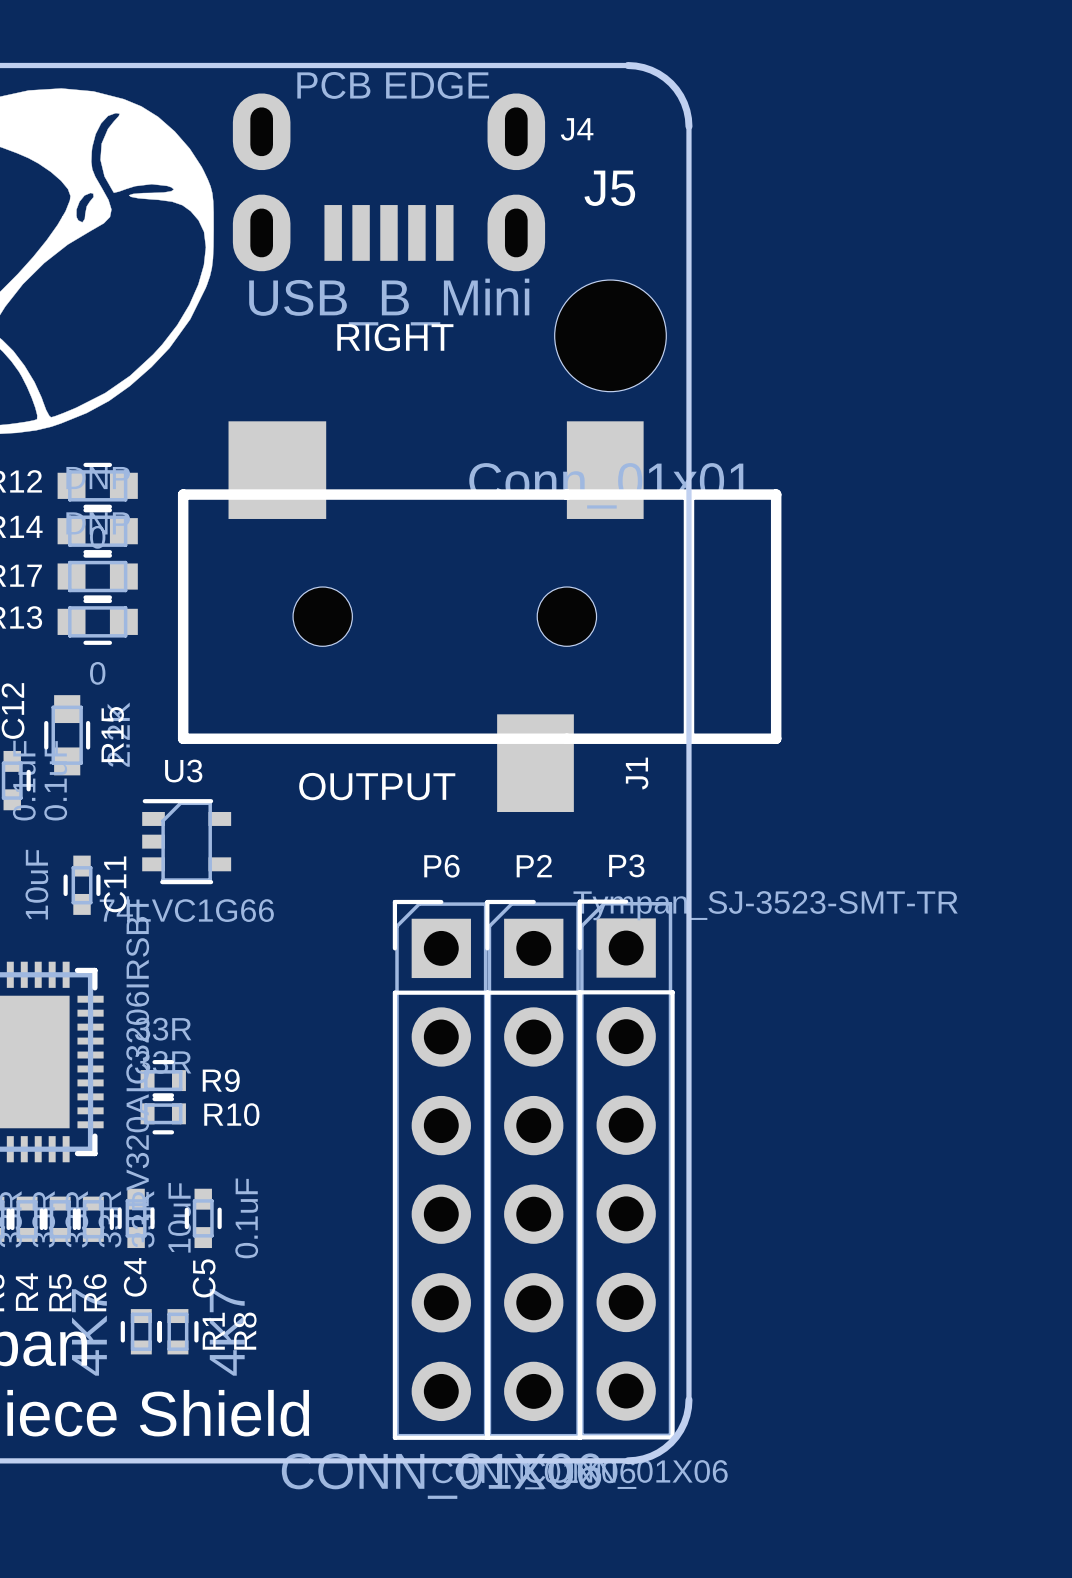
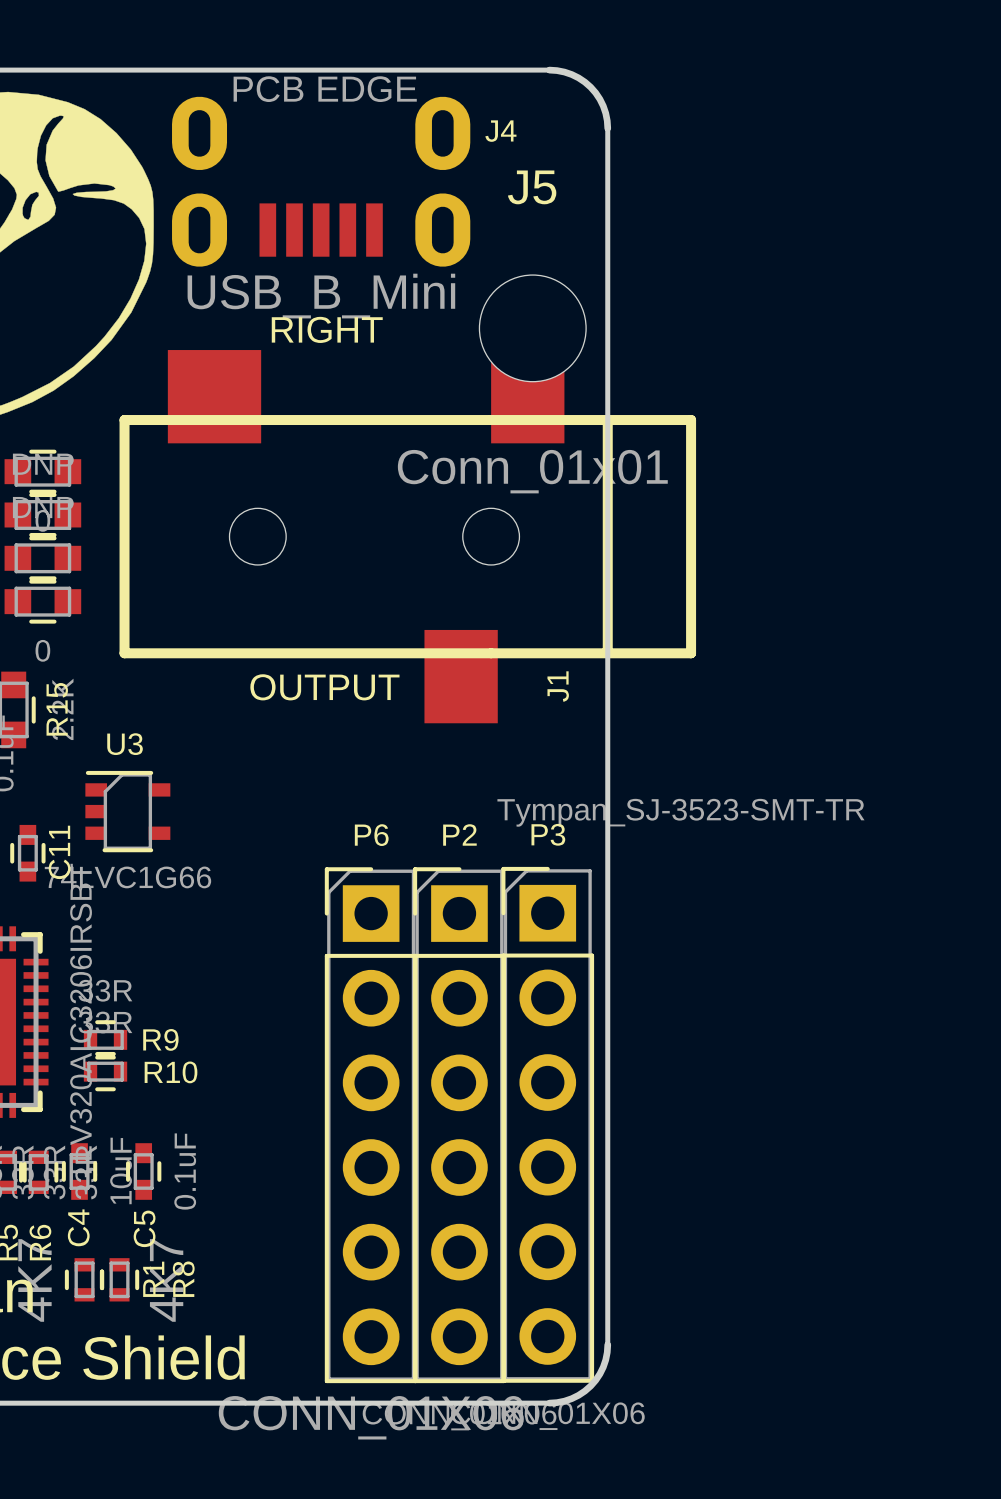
J1 position: (479, 616) -> (407, 536)
text position: OUTPUT (377, 786) -> OUTPUT (324, 687)

